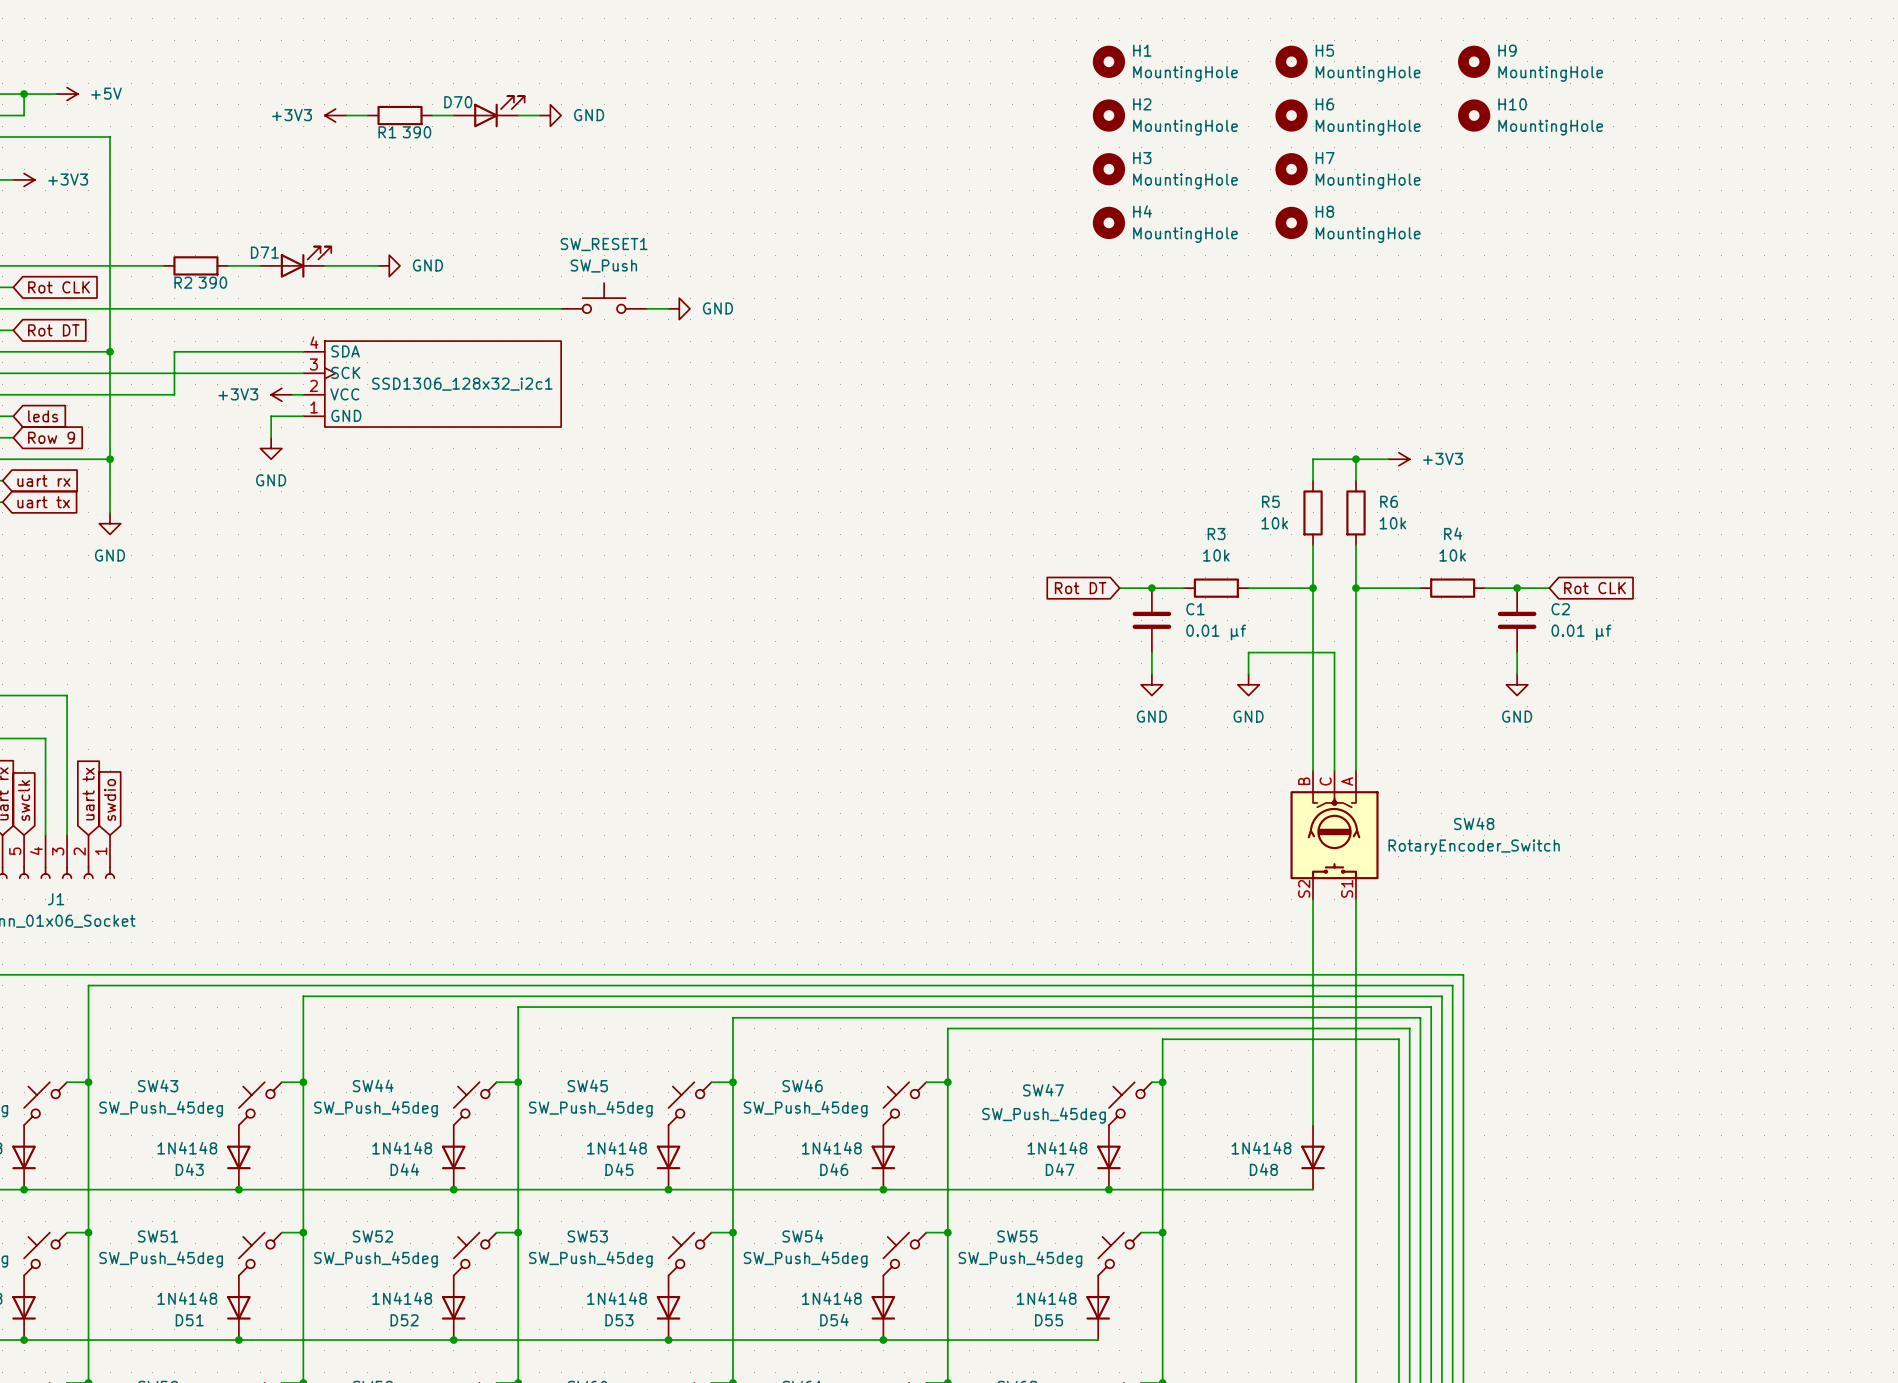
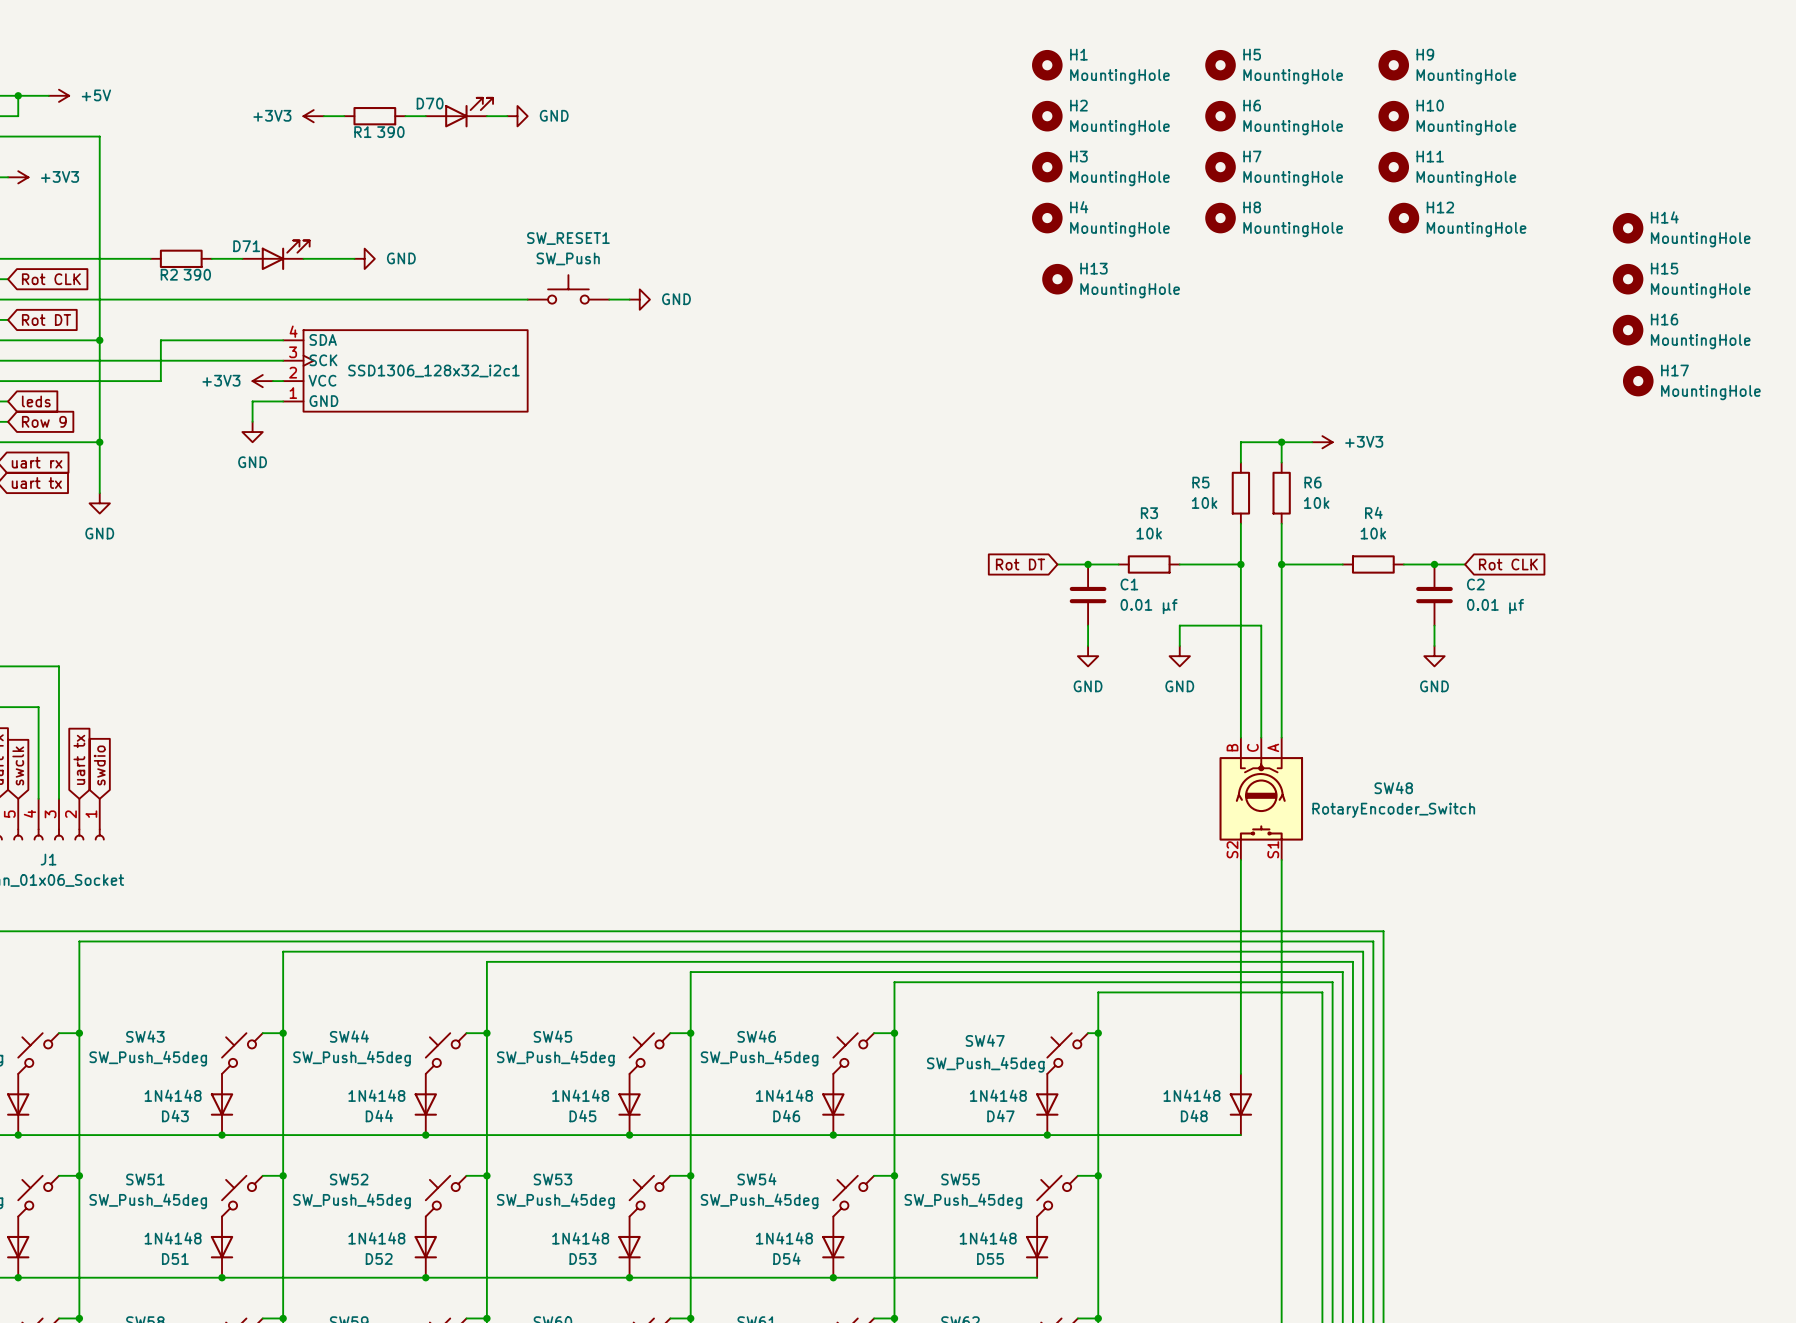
H11: none -> MountingHole (1393, 167)
H12: none -> MountingHole (1403, 218)
H14: none -> MountingHole (1628, 228)
H13: none -> MountingHole (1057, 279)
H15: none -> MountingHole (1628, 279)
H16: none -> MountingHole (1628, 330)
H17: none -> MountingHole (1638, 381)

